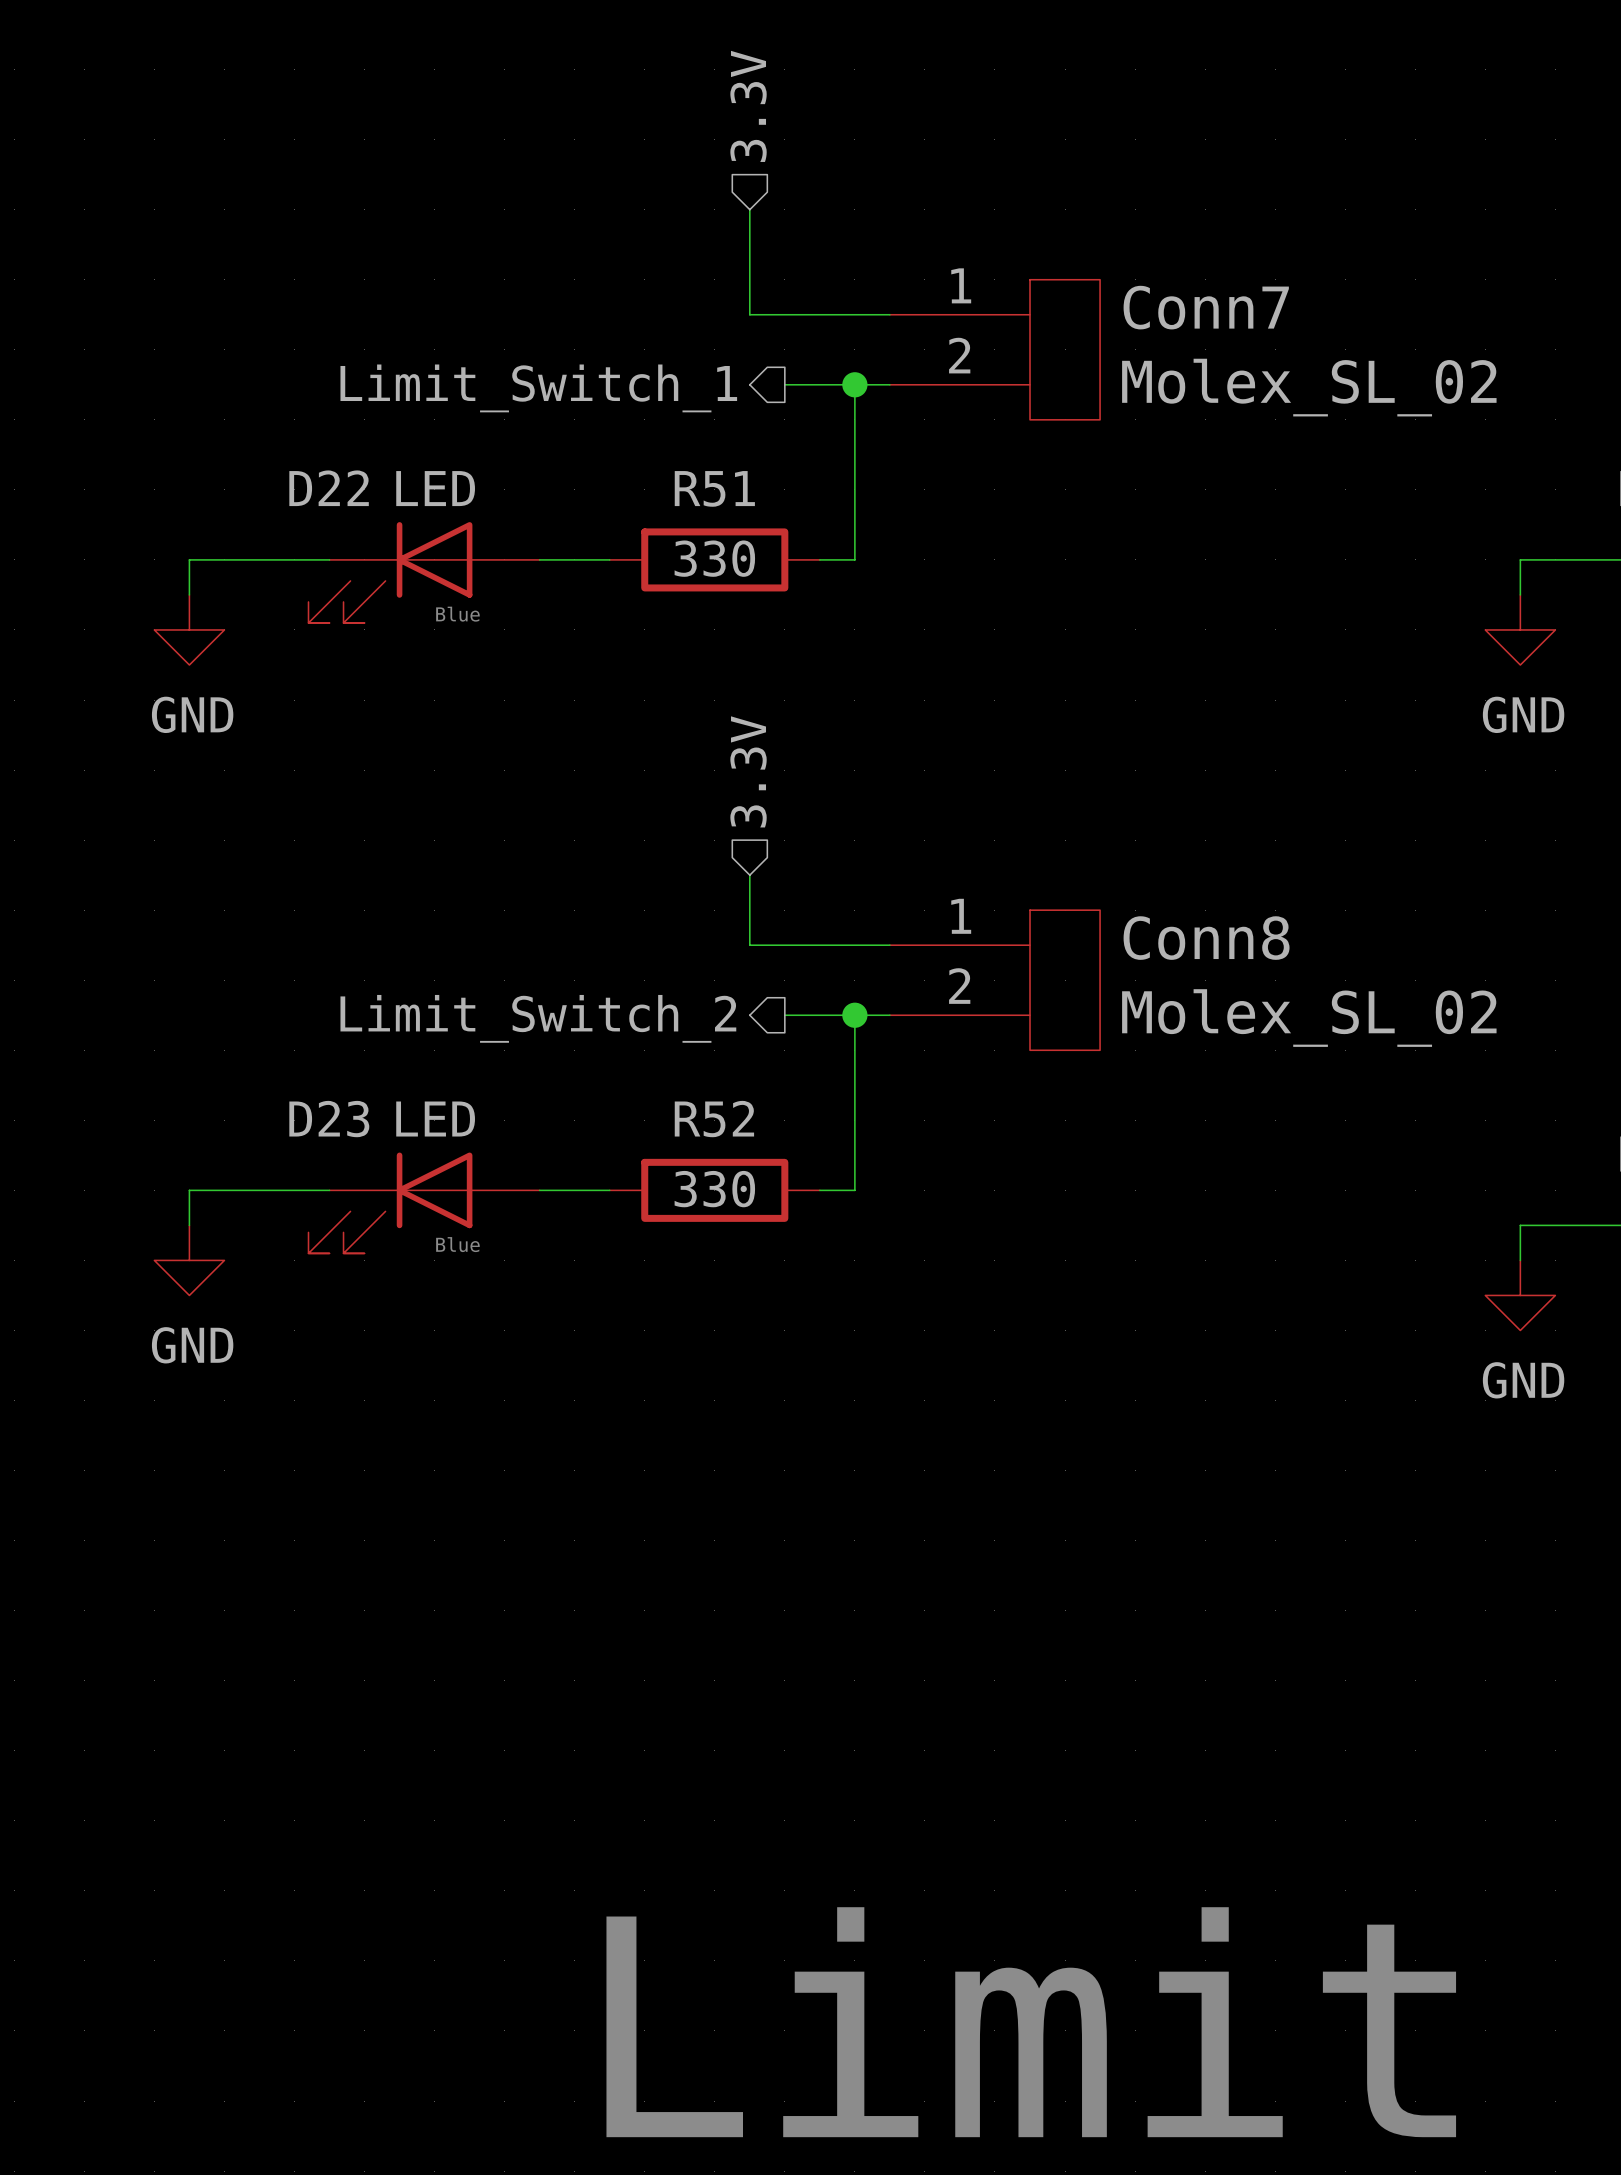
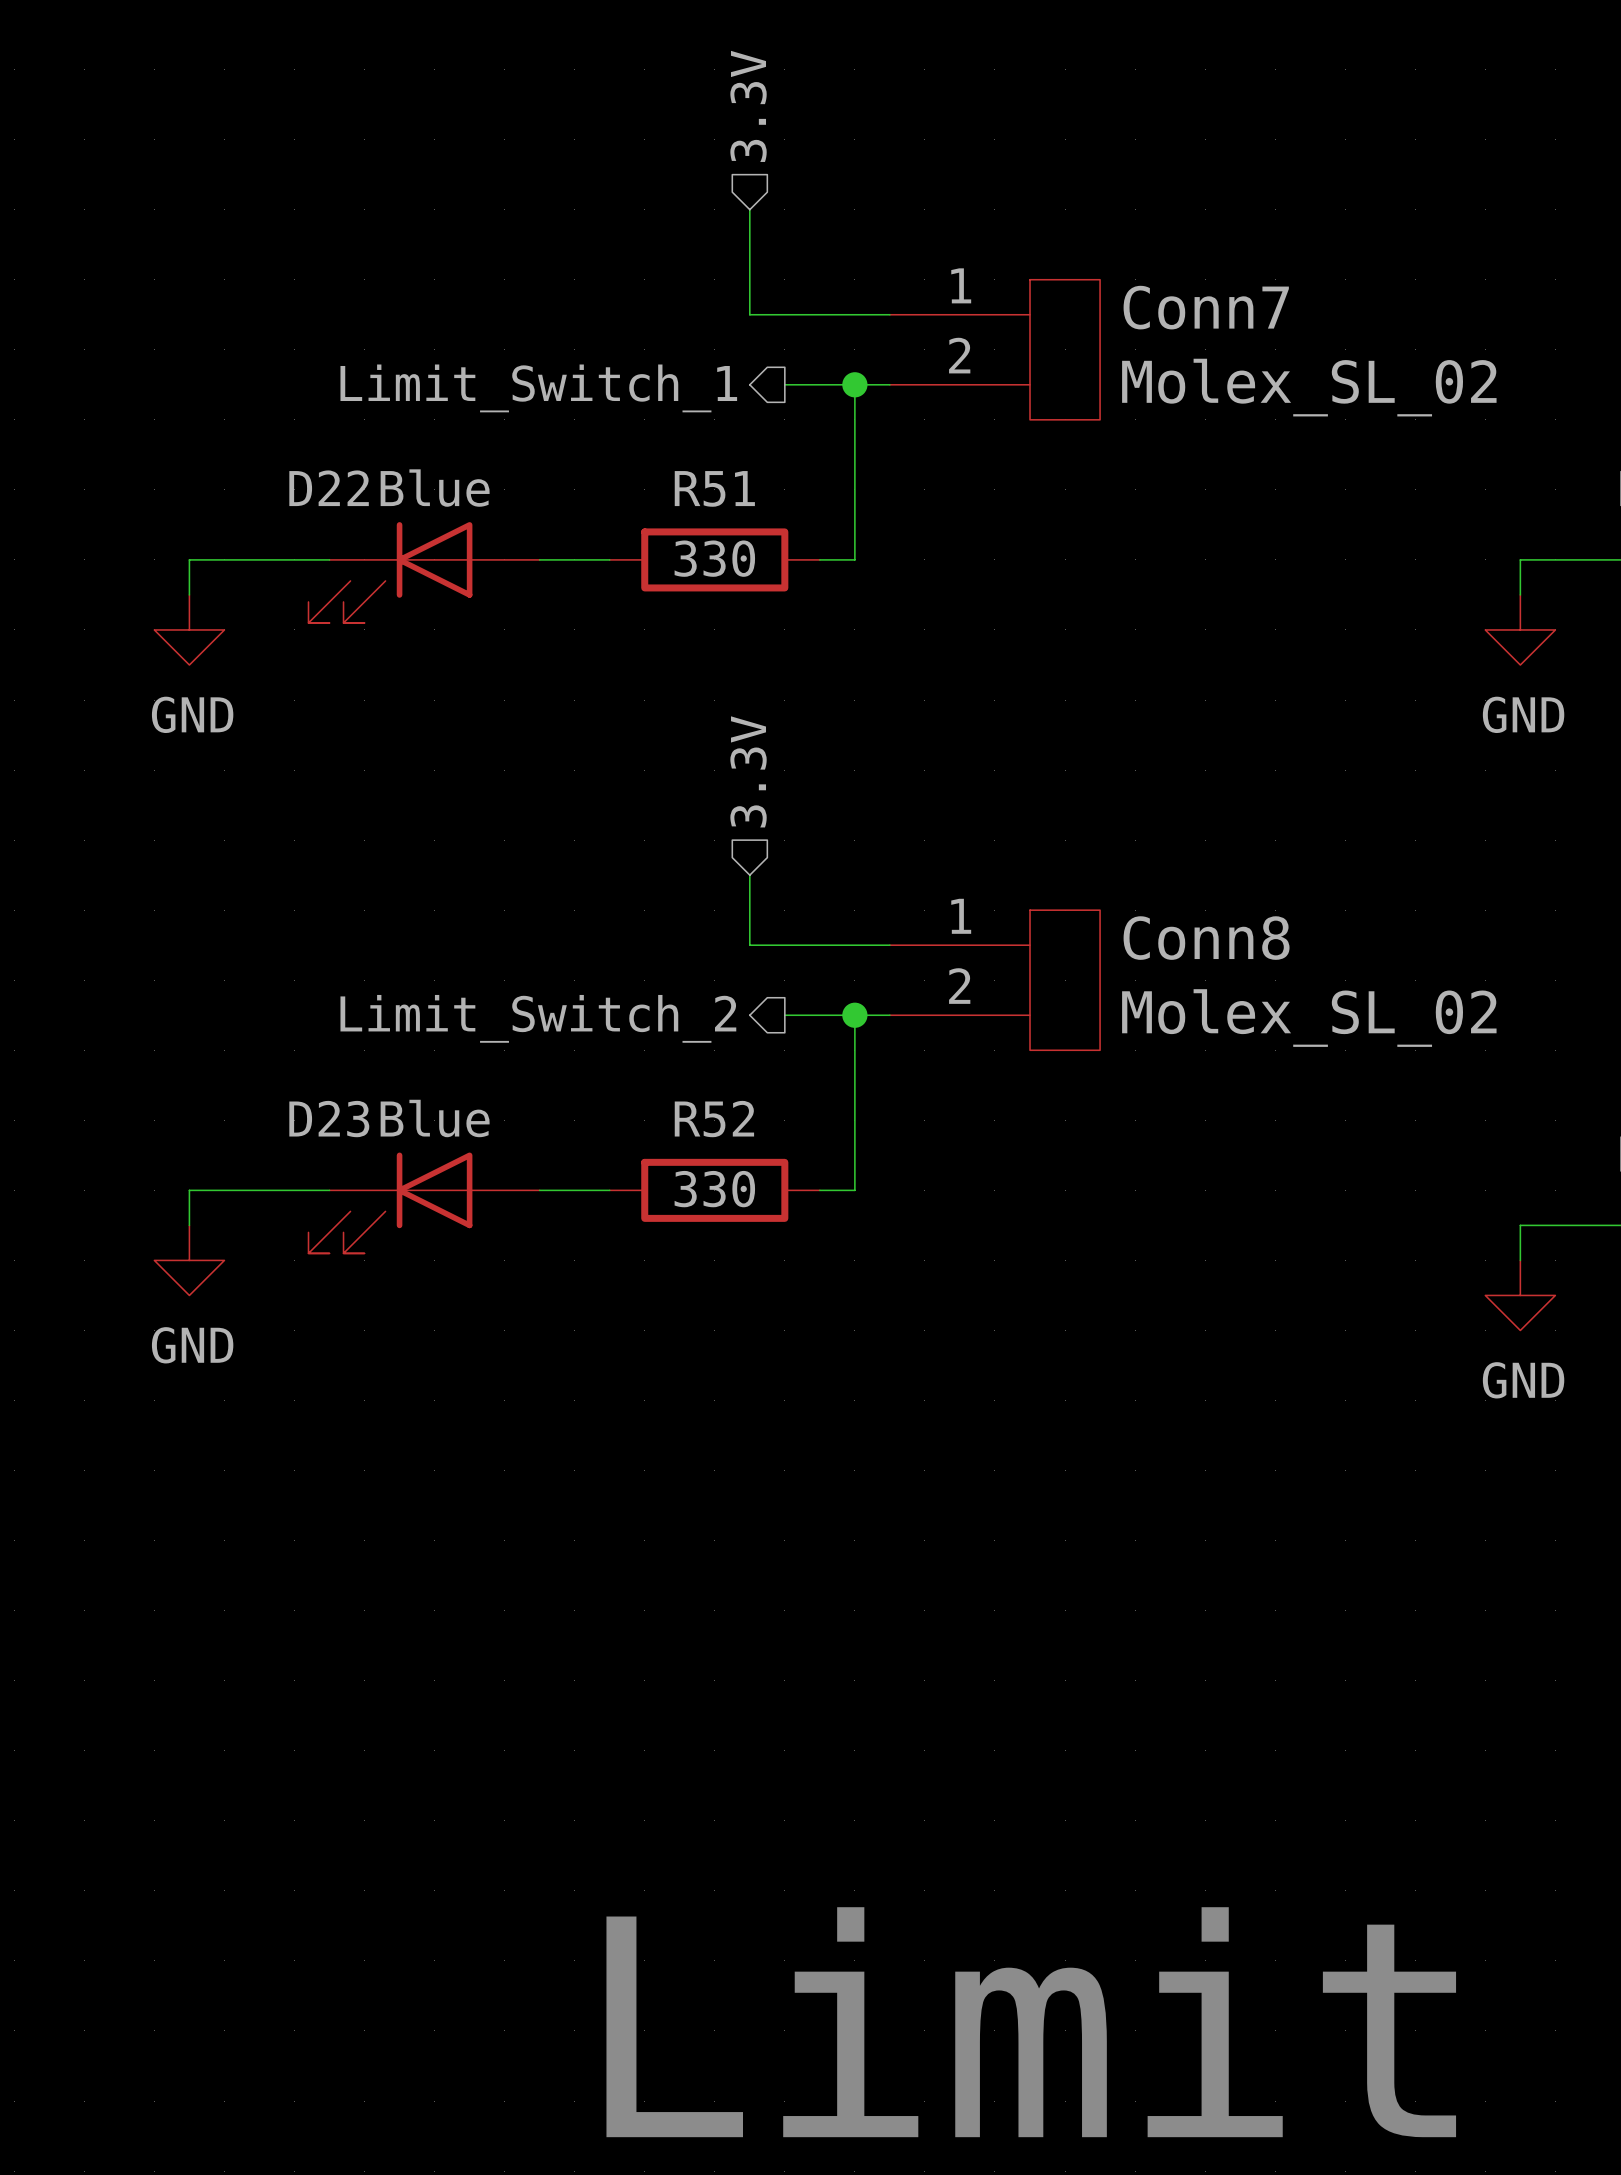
D22 value: LED (435, 488) -> Blue (435, 488)
text: Blue (457, 614) -> none
D23 value: LED (435, 1119) -> Blue (435, 1118)
text: Blue (457, 1244) -> none

